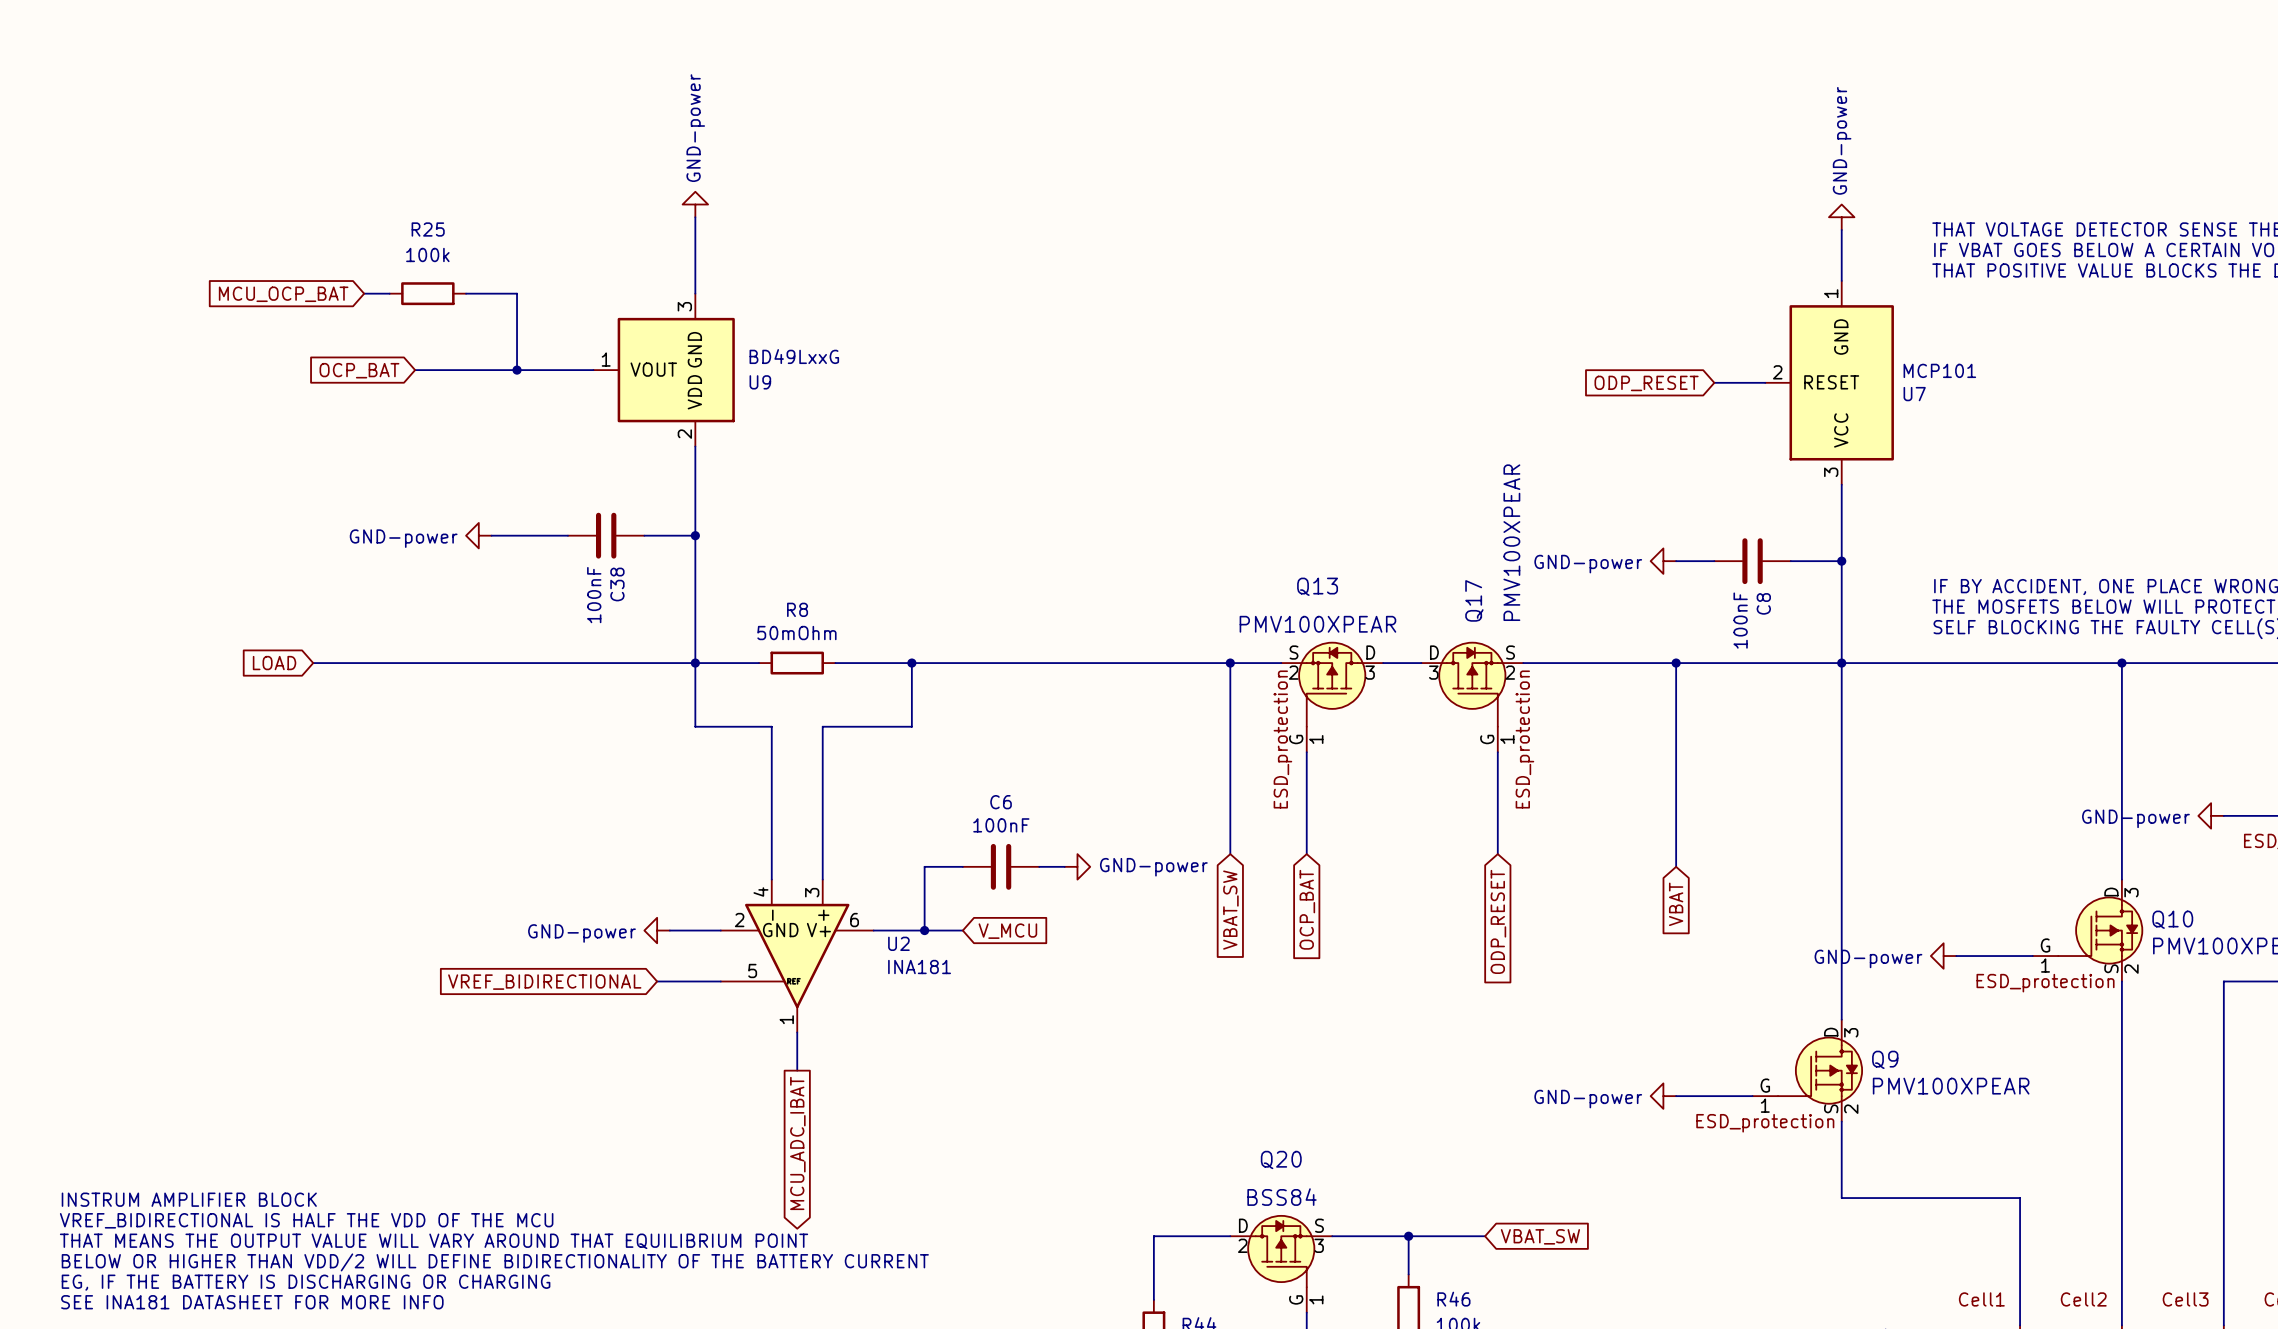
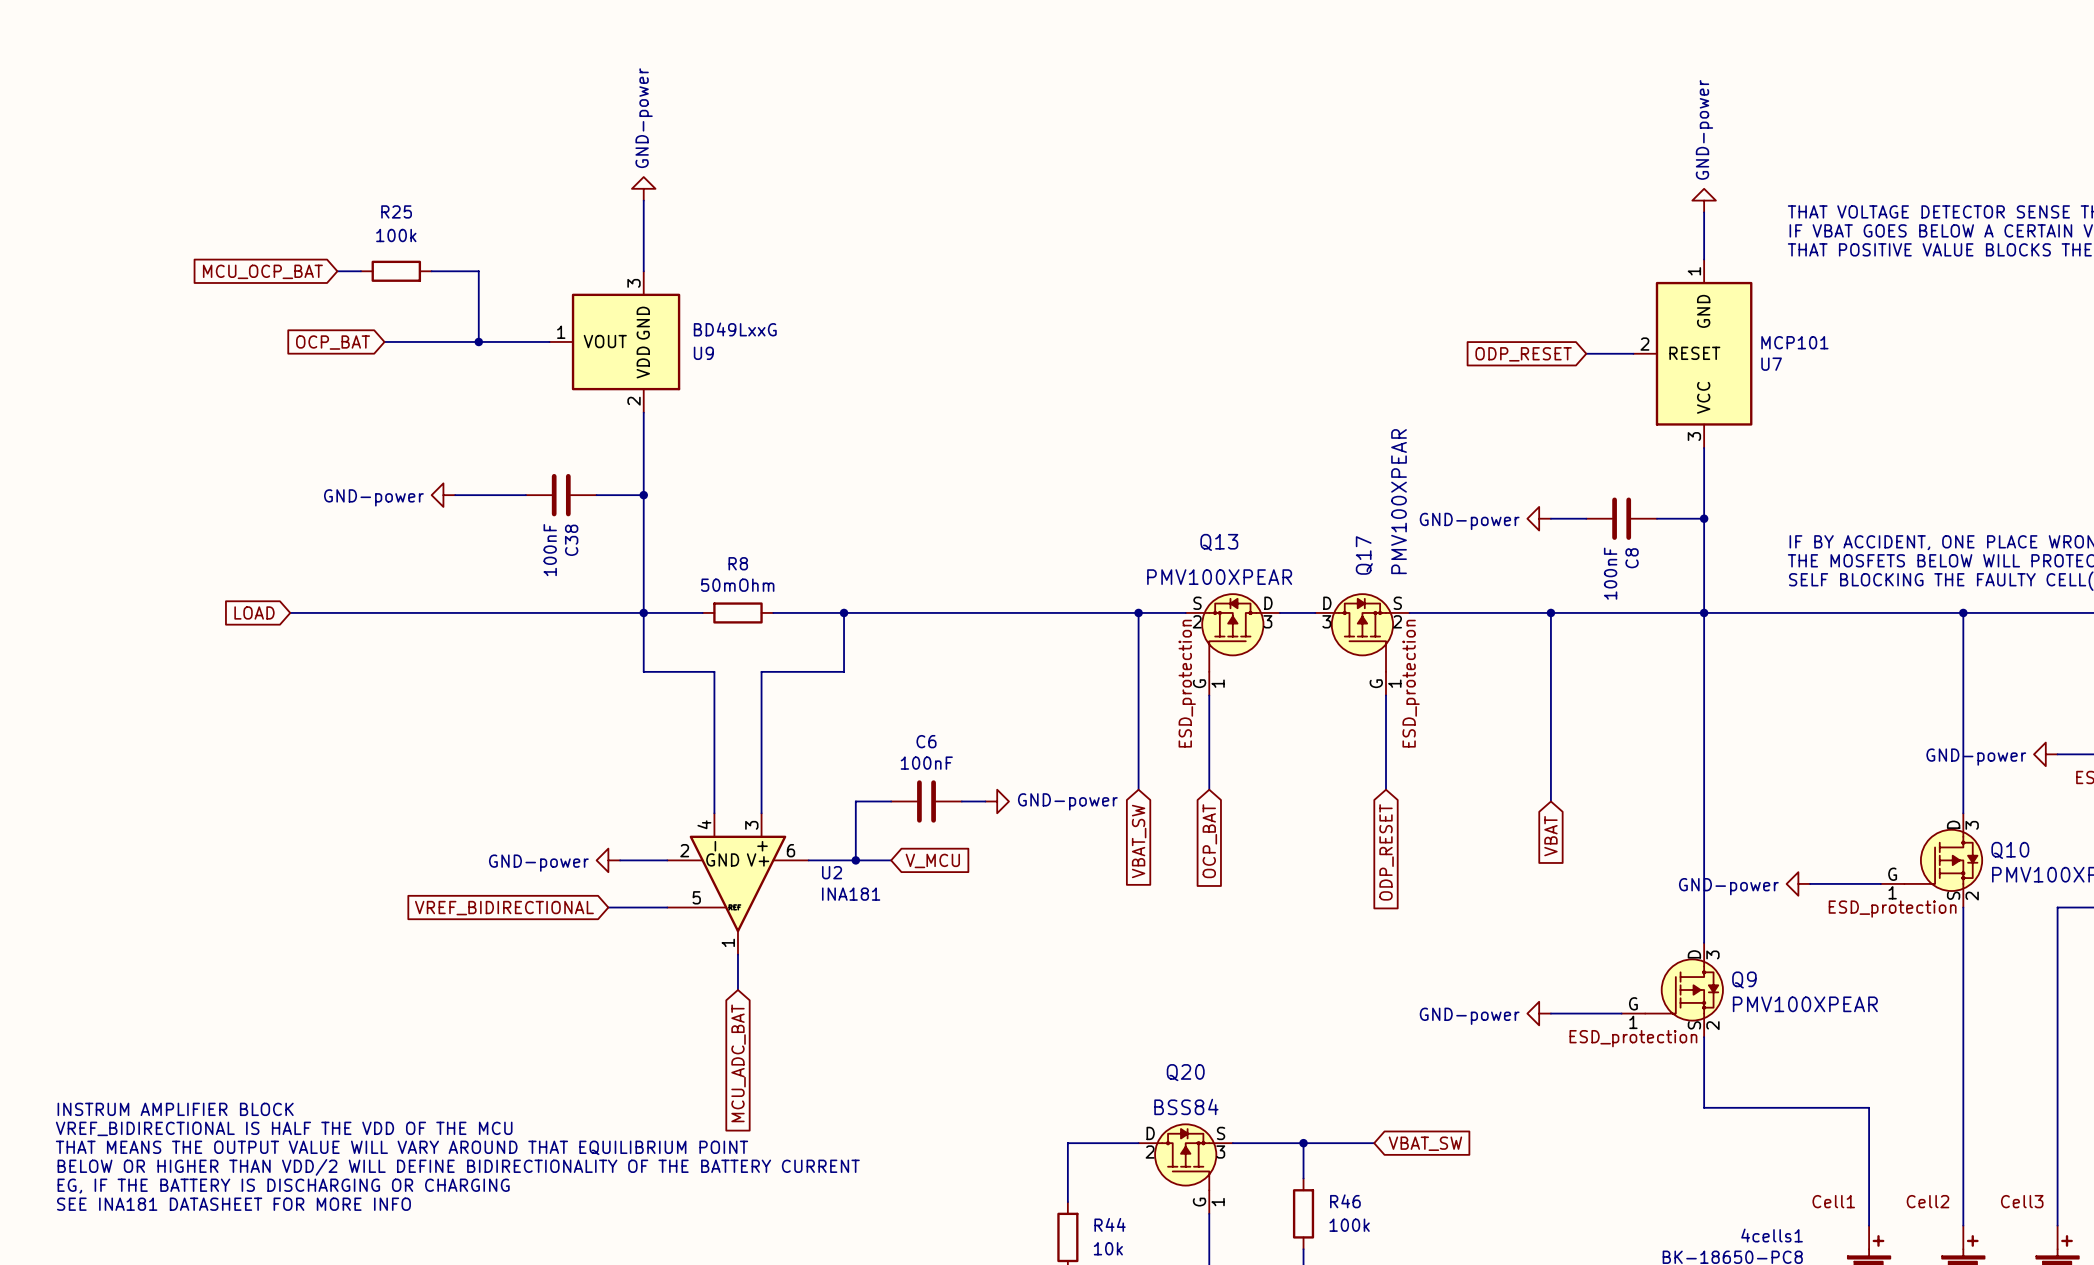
global label shape: output (797, 1143) -> input (738, 1063)
global label: MCU_ADC_IBAT (797, 1143) -> MCU_ADC_BAT (738, 1063)

